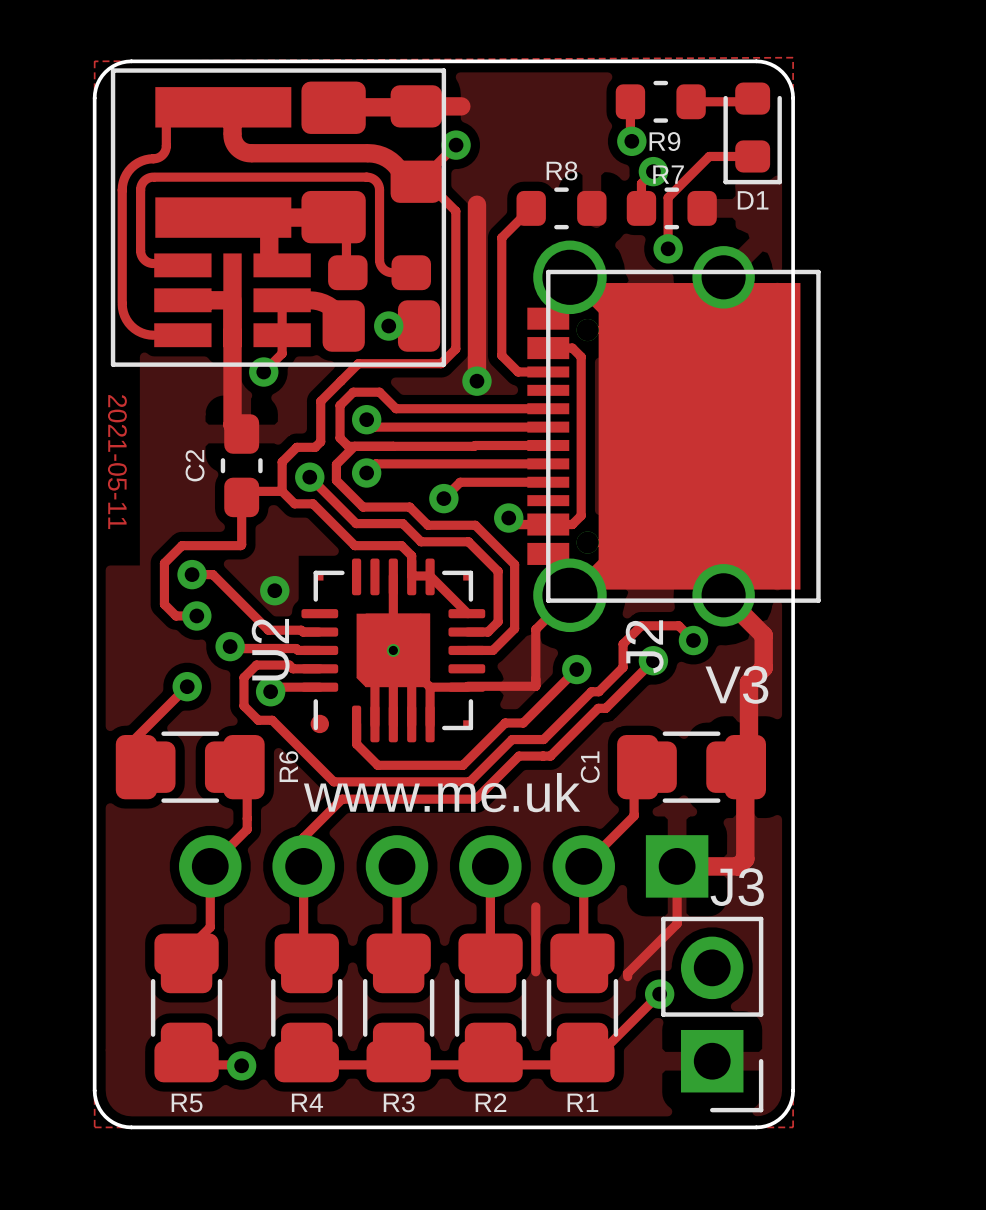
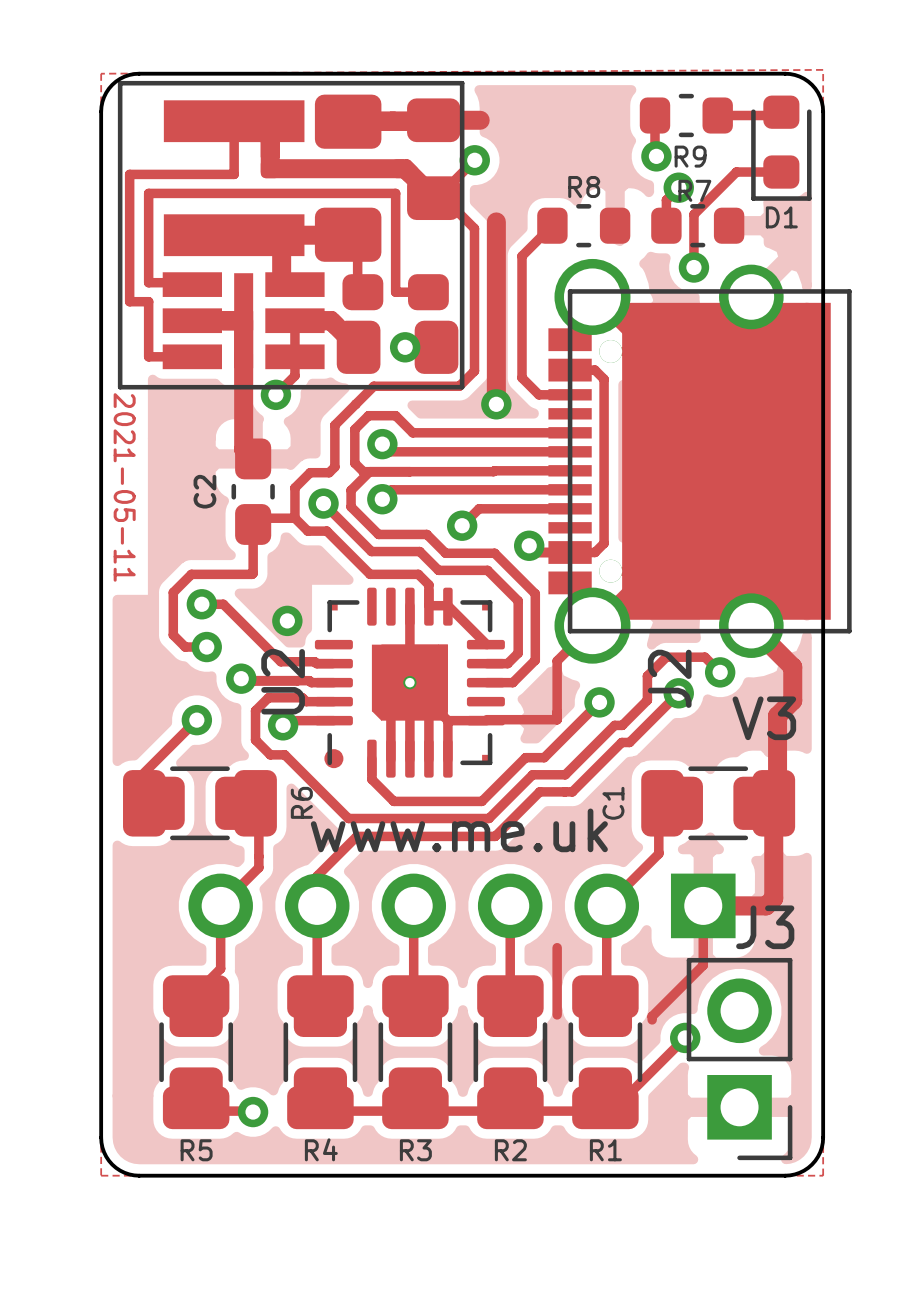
part footprint: [110, 68, 447, 367] -> [117, 80, 465, 390]

